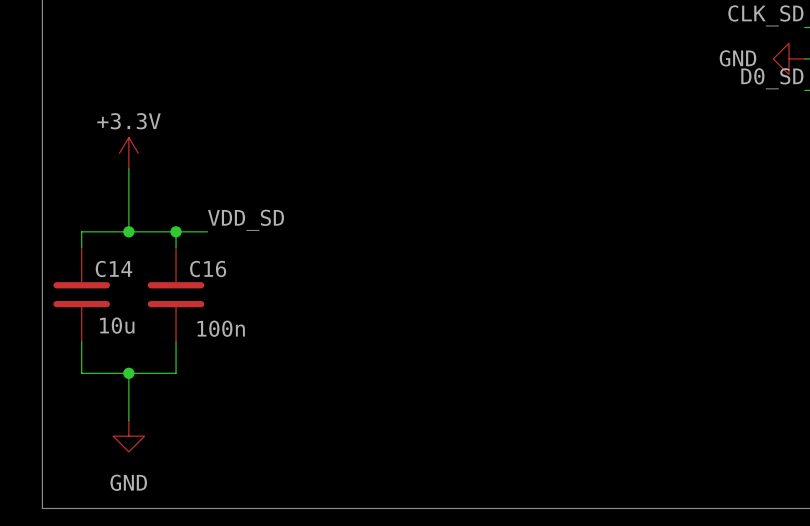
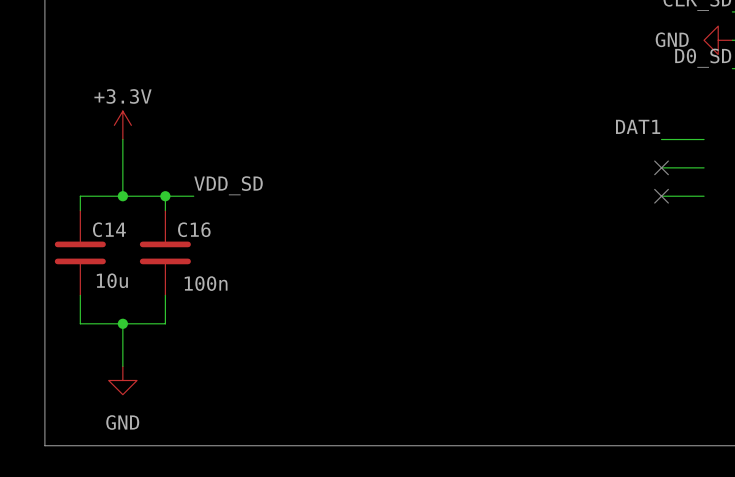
label: none -> DAT1 (638, 126)
wire: none -> (661, 139) (704, 139)
wire: none -> (661, 167) (704, 167)
no-connect mark: none -> (661, 167)
wire: none -> (661, 196) (704, 196)
no-connect mark: none -> (661, 196)

